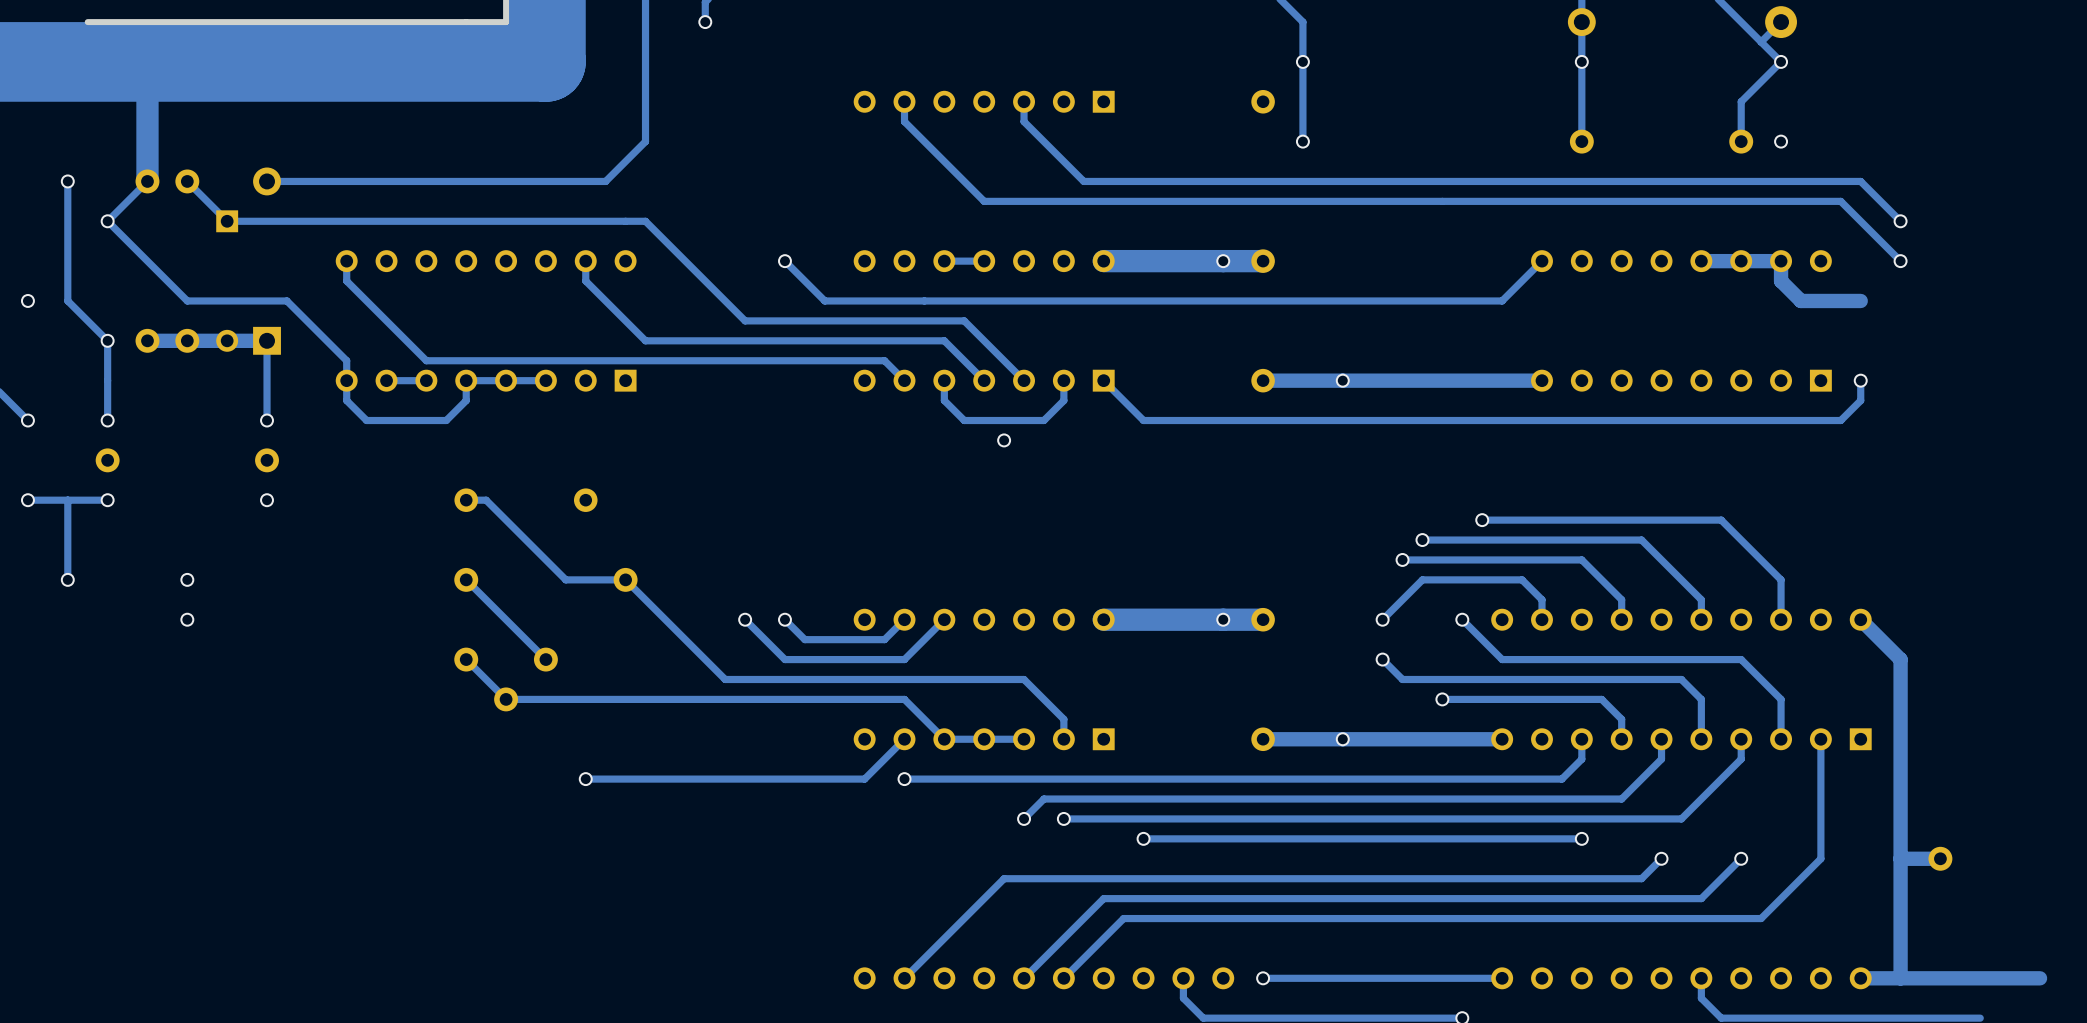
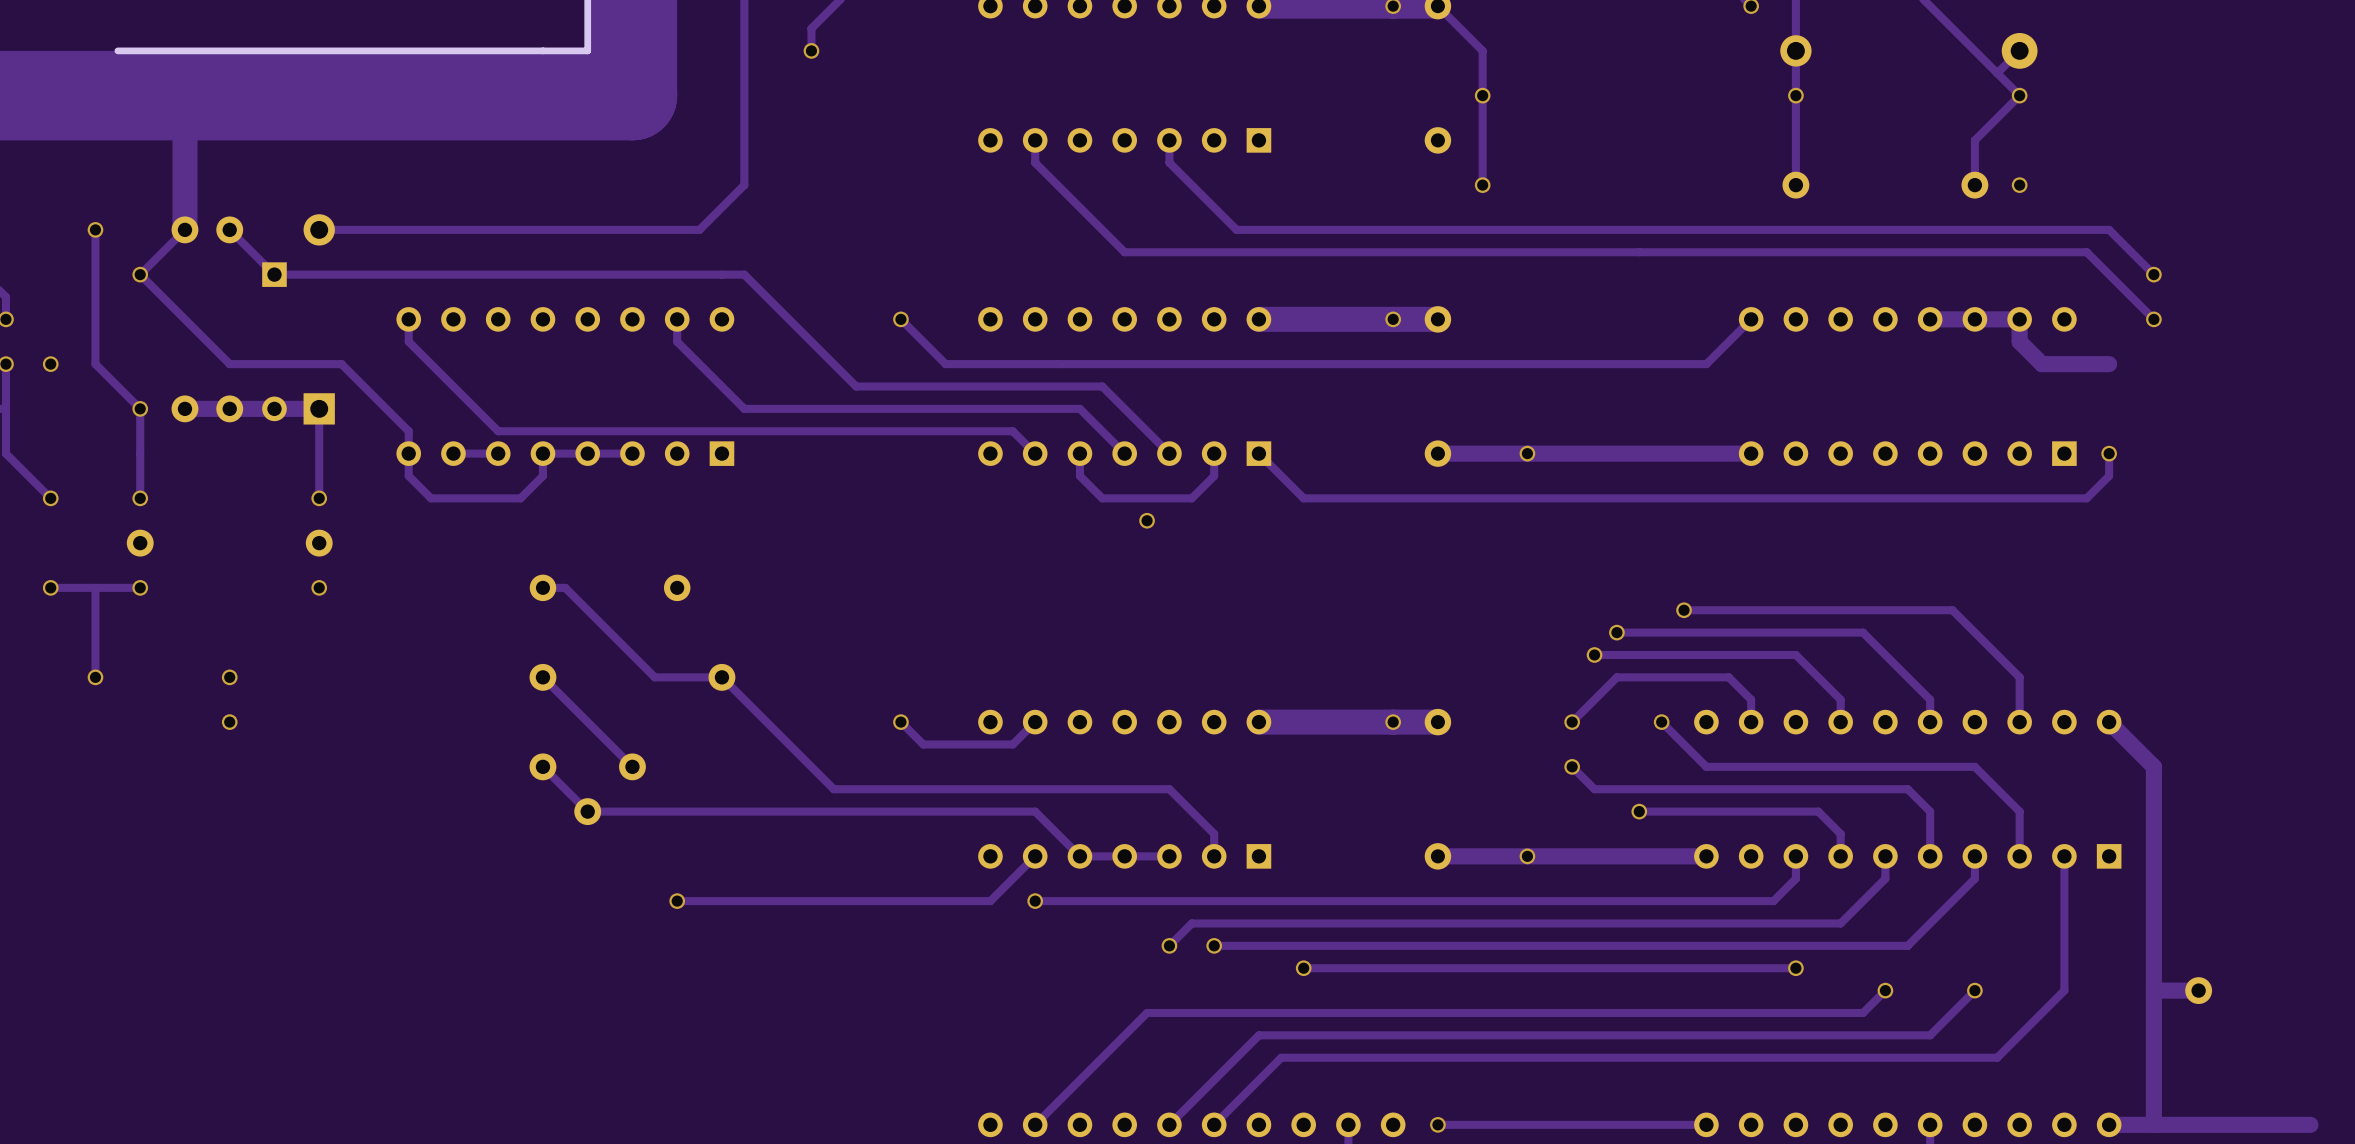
track: (984, 261) (944, 261) -> none
via: (745, 619) -> none
track: (944, 619) (904, 659) (784, 659) (745, 619) -> none

